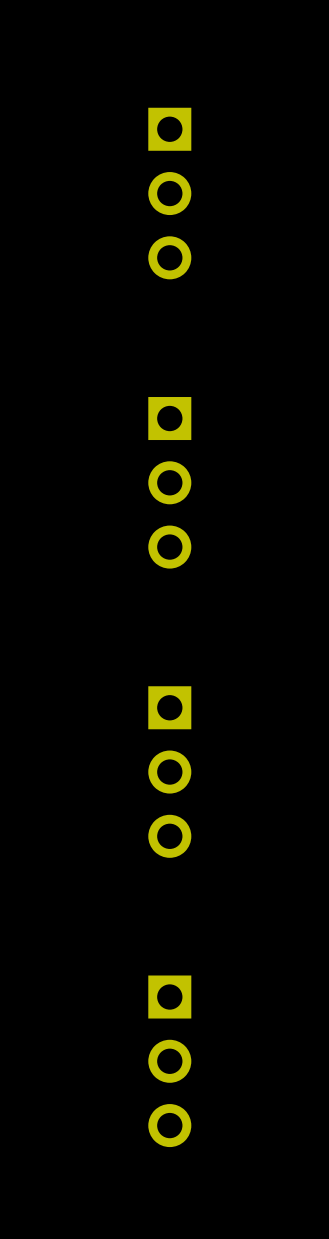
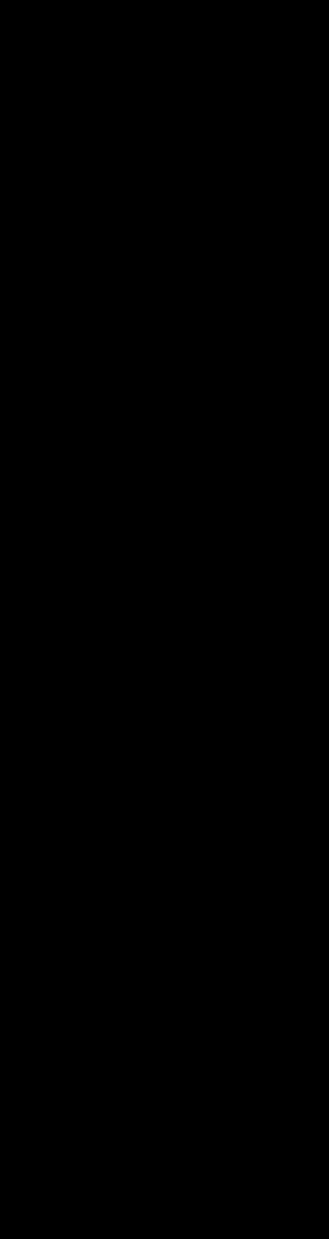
part: (169, 193) -> none
part: (169, 482) -> none
part: (169, 772) -> none
part: (169, 1061) -> none

